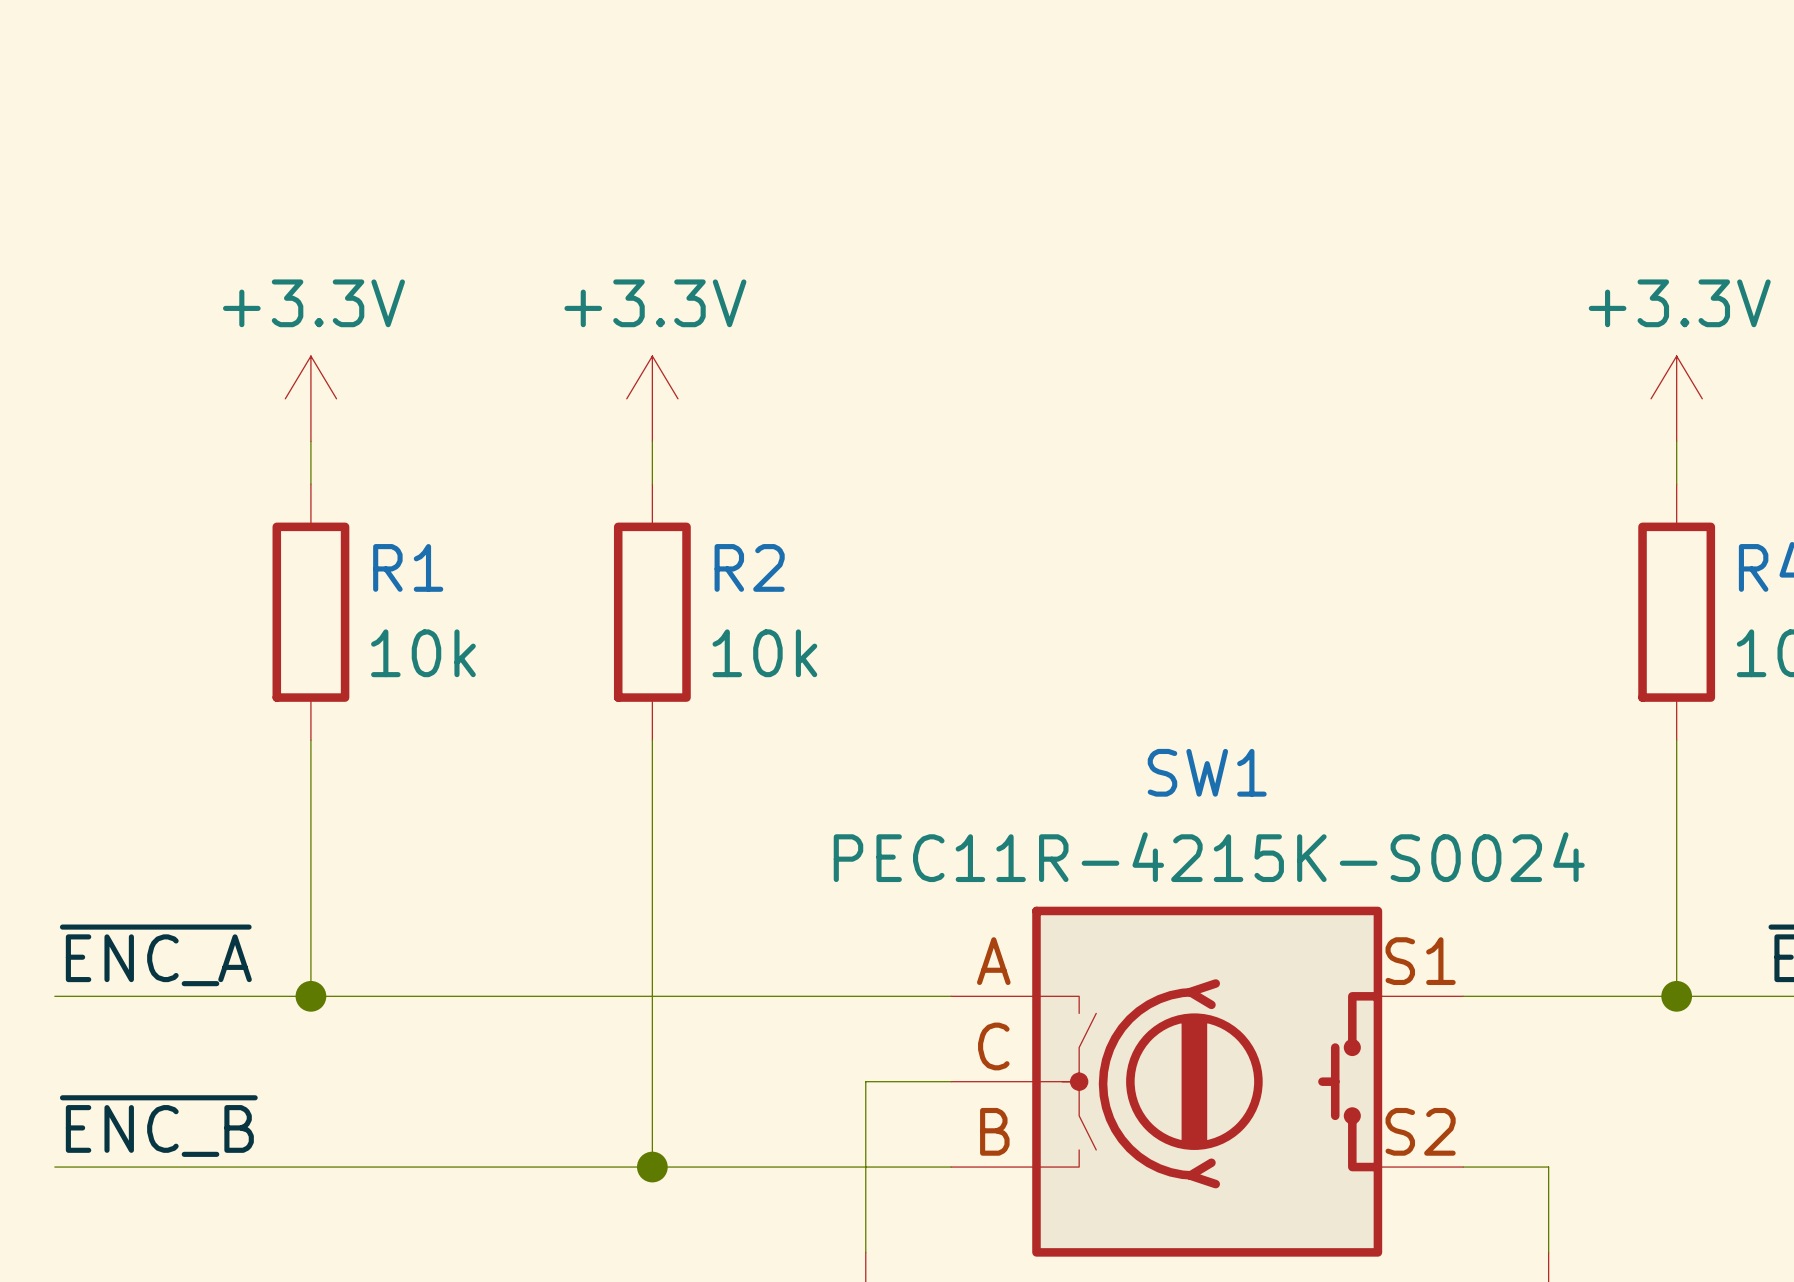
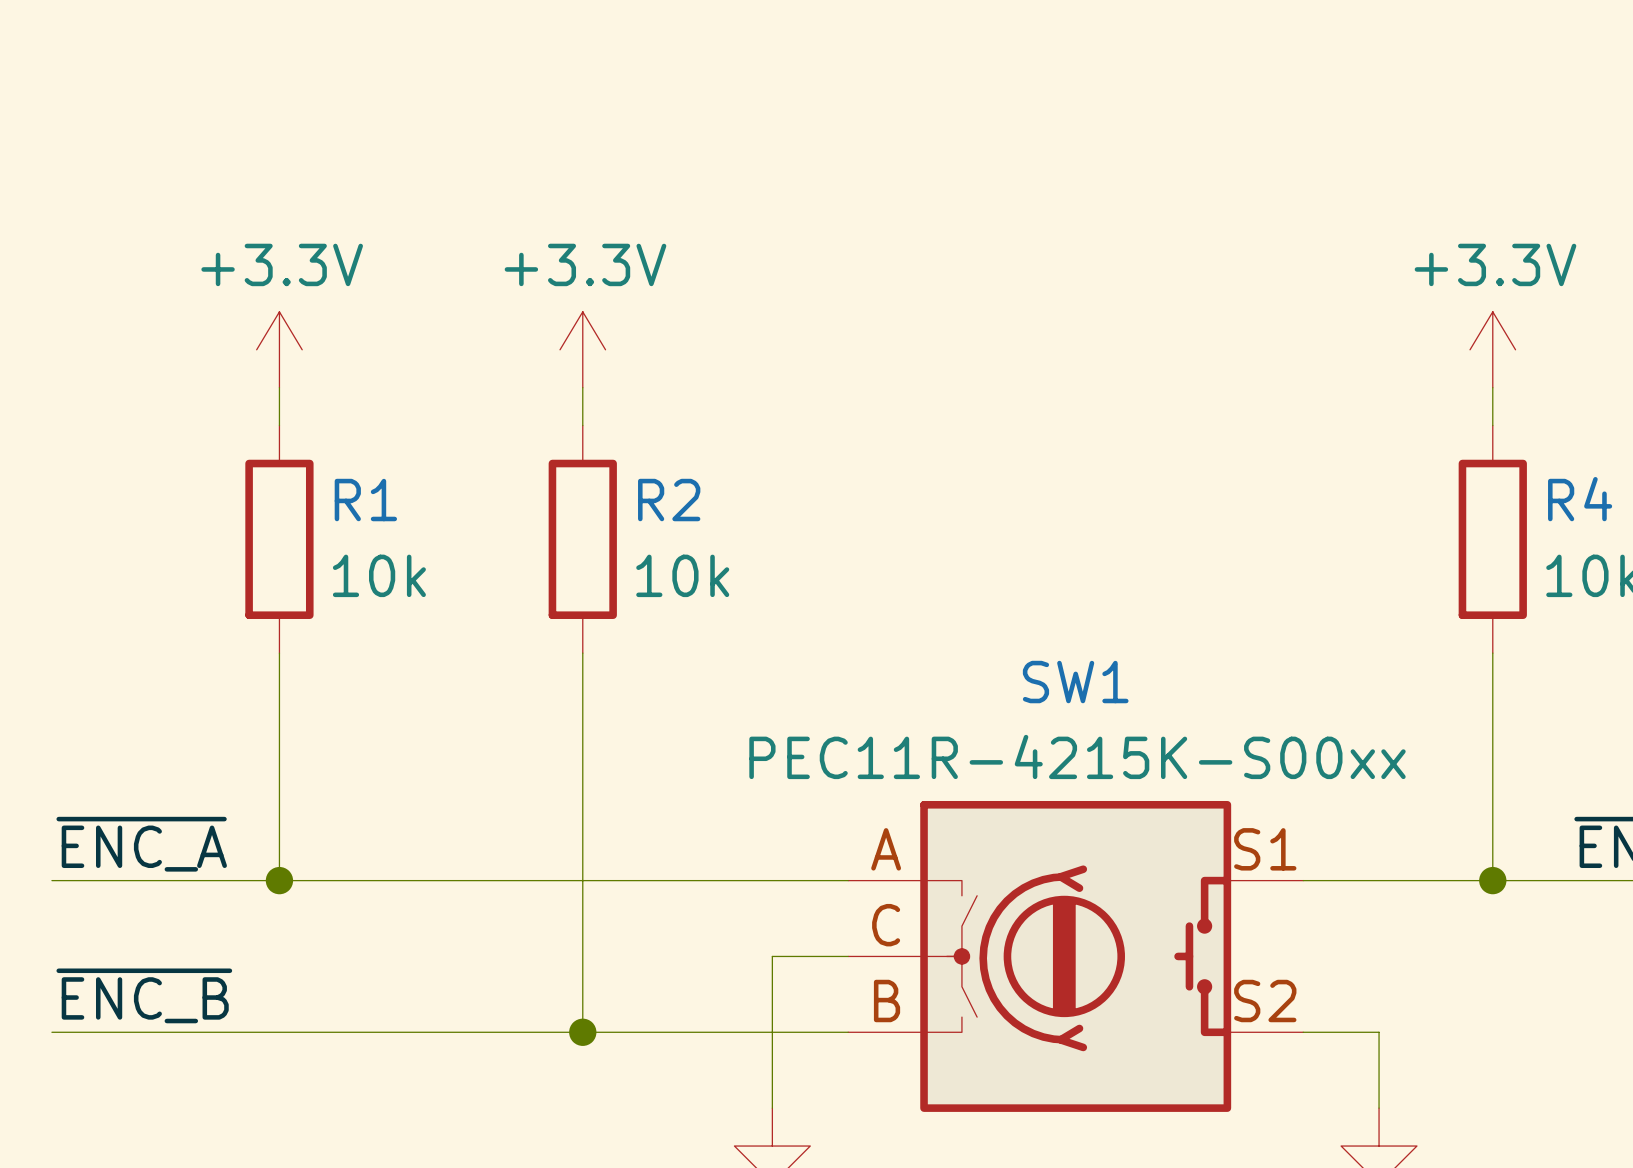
SW1 value: PEC11R-4215K-S0024 (1209, 857) -> PEC11R-4215K-S00xx (1077, 756)

